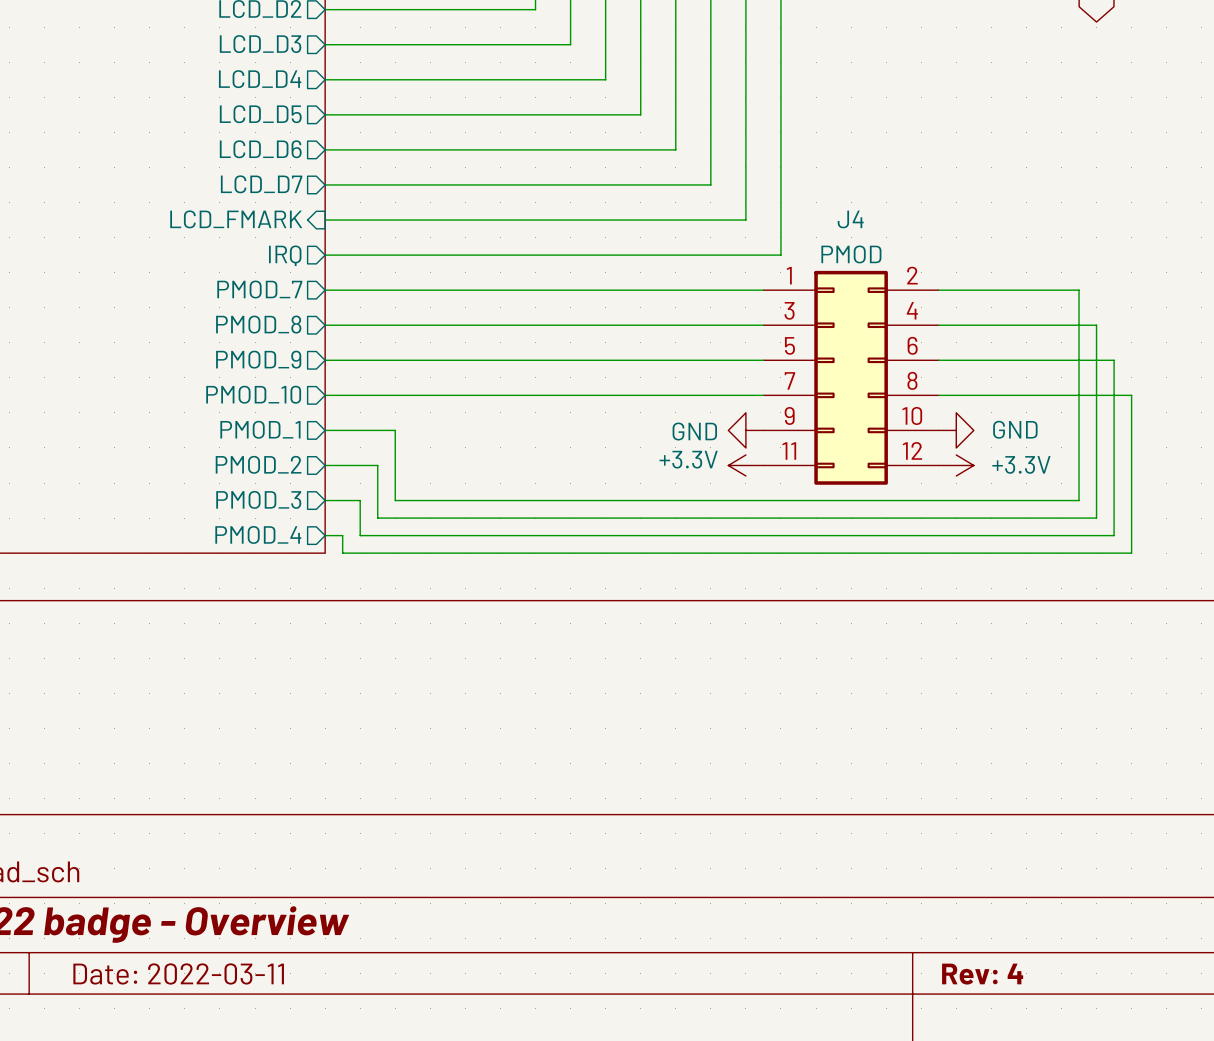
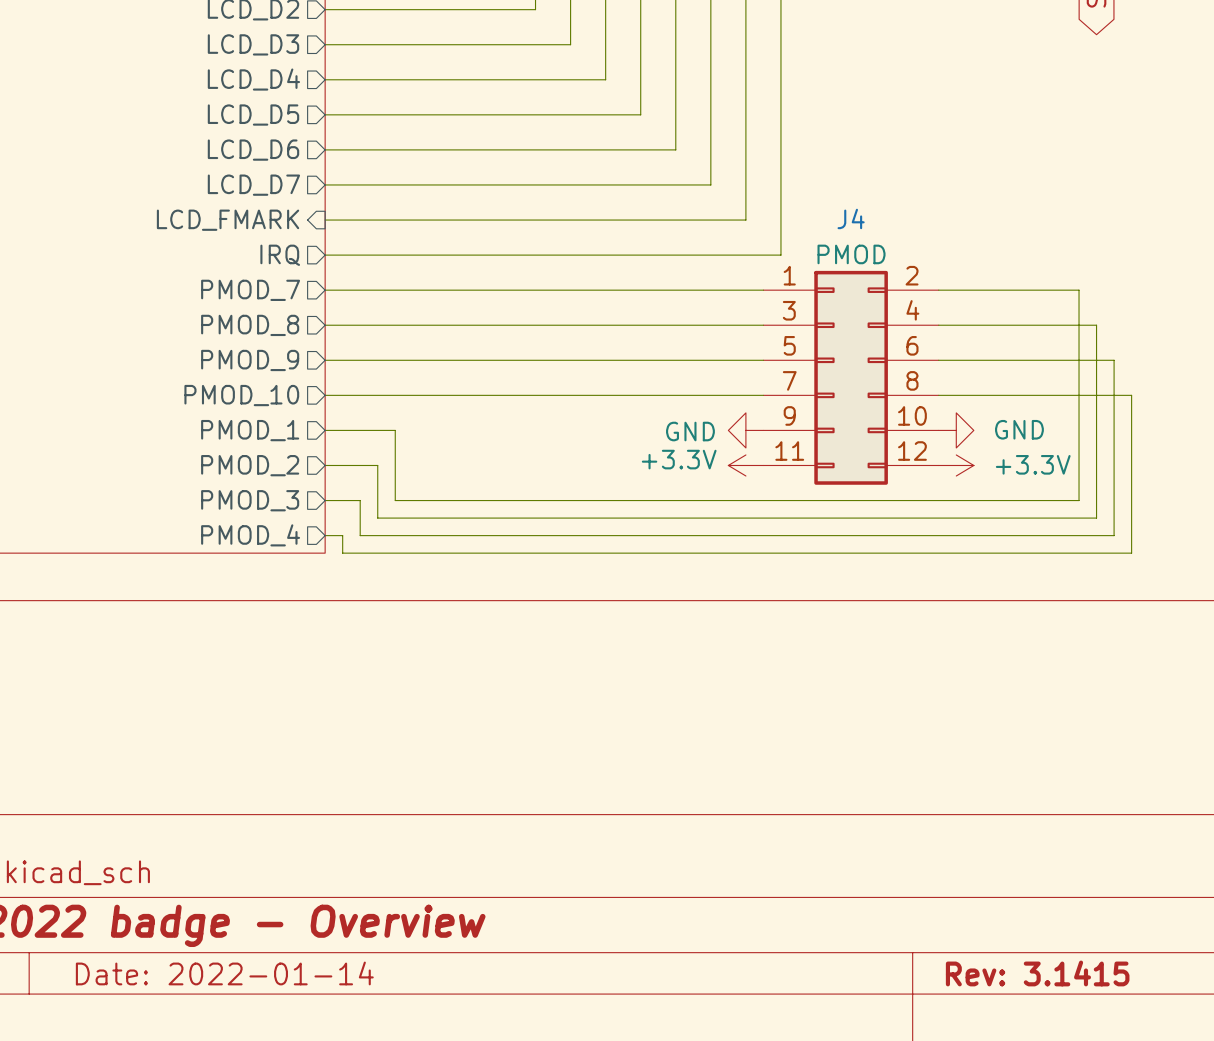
title block: Date: 2022-03-11 (178, 973) -> Date: 2022-01-14 (224, 973)
title block: Rev: 4 (982, 974) -> Rev: 3.1415 (1037, 973)

